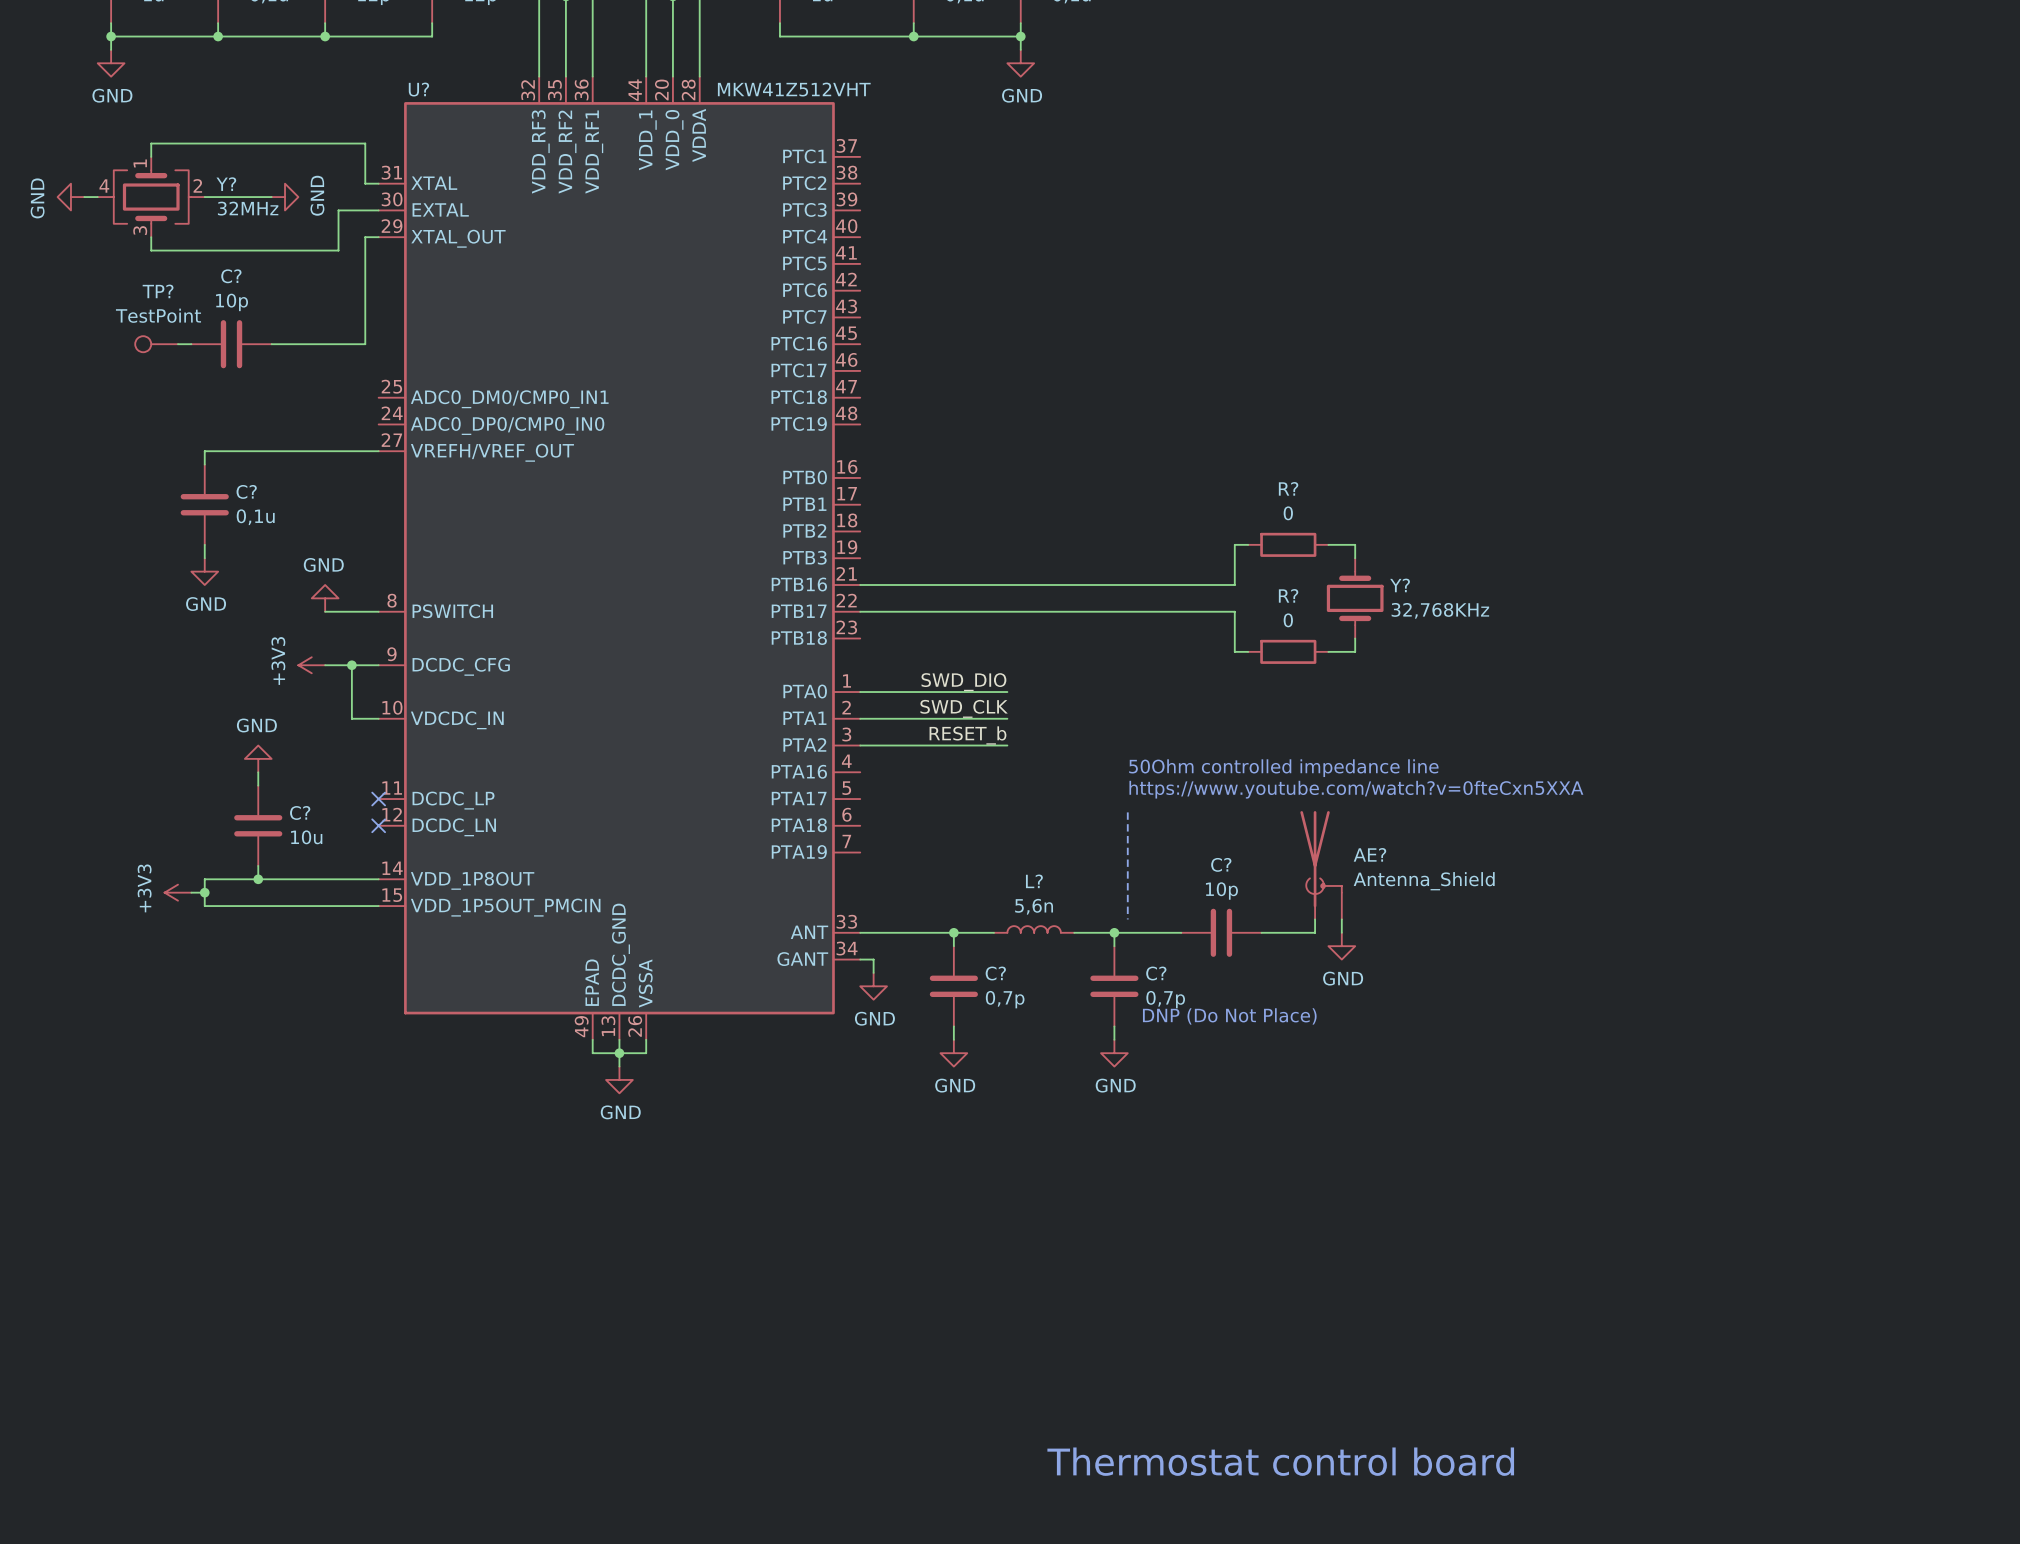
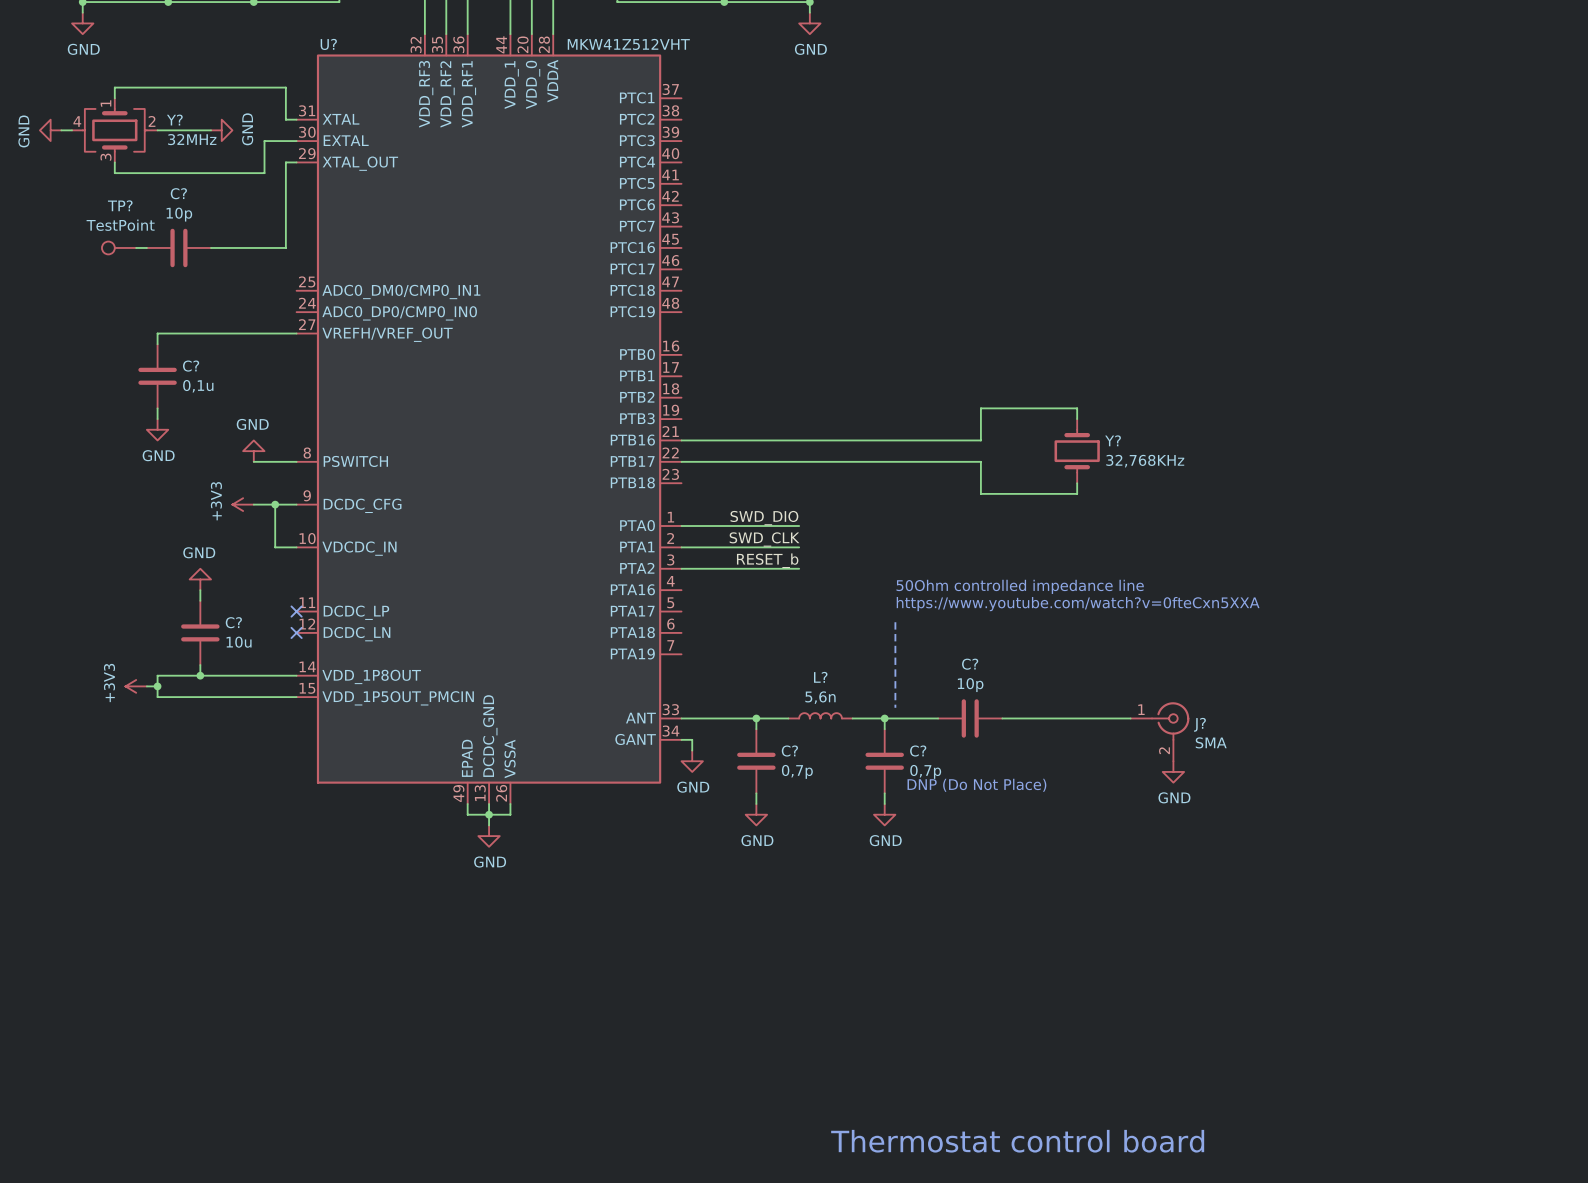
wire: none -> (991, 408) (1055, 408)
R?: 0 (1288, 544) -> none
wire: none -> (991, 493) (1055, 493)
R?: 0 (1288, 651) -> none
AE?: Antenna_Shield (1321, 865) -> none
wire: (1315, 919) (1315, 932) -> (1130, 718) (1045, 718)
wire: (1341, 919) (1341, 932) -> none
power symbol position: GND (1341, 946) -> GND (1173, 771)
J?: none -> SMA (1160, 731)

